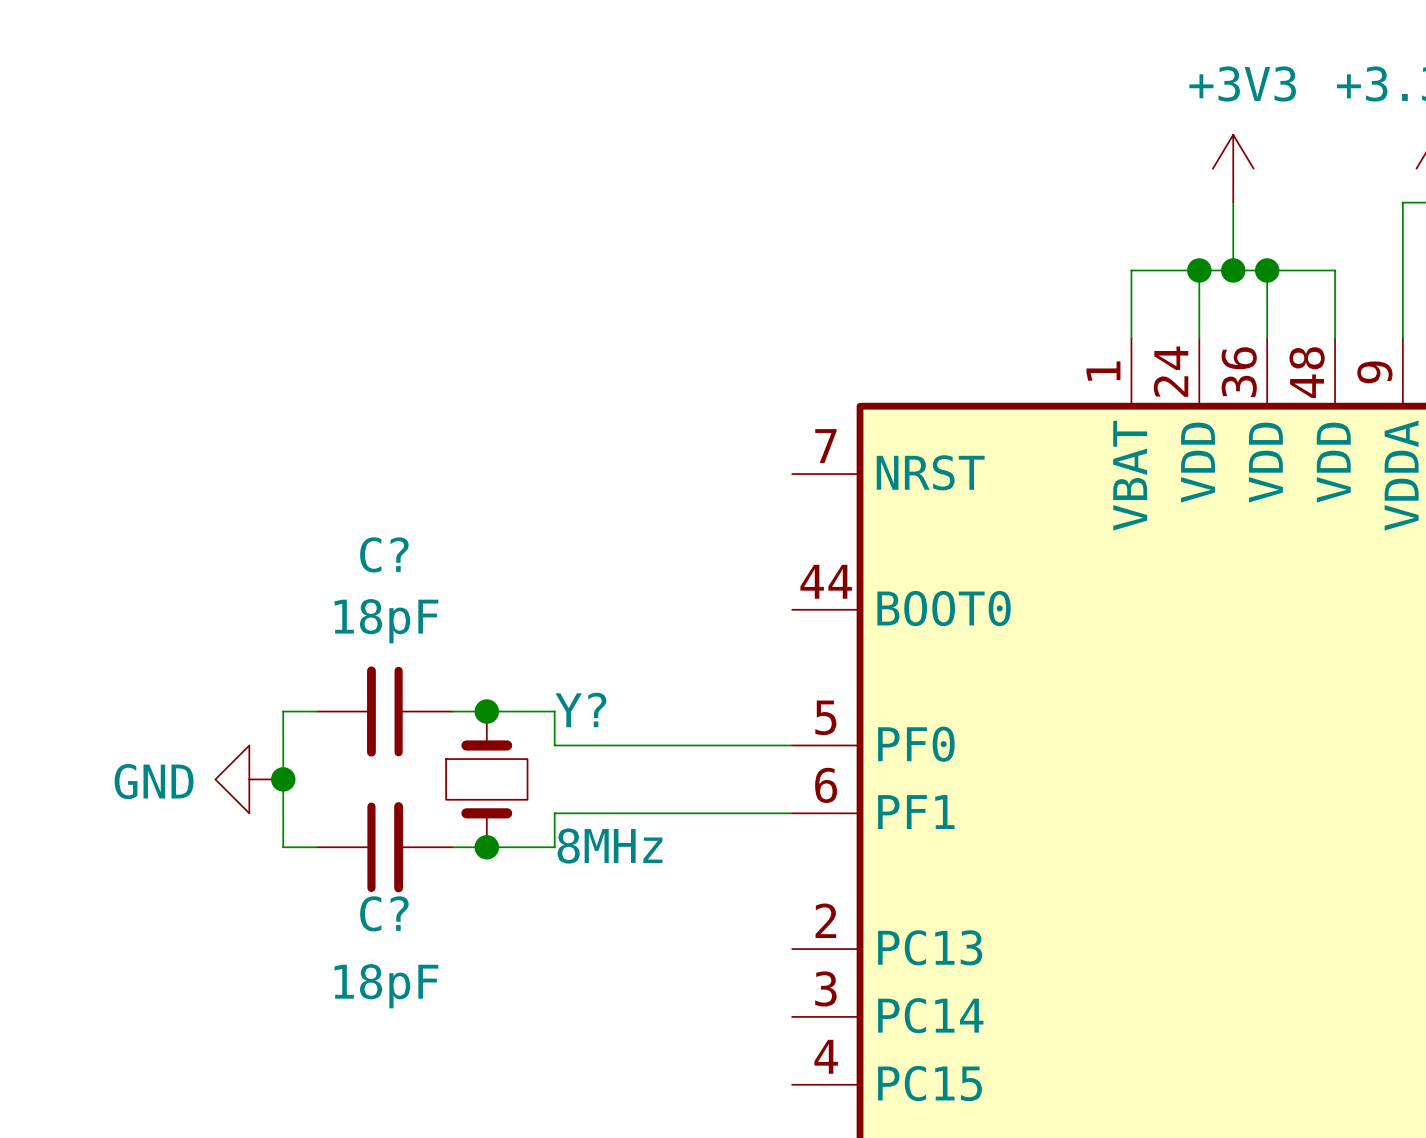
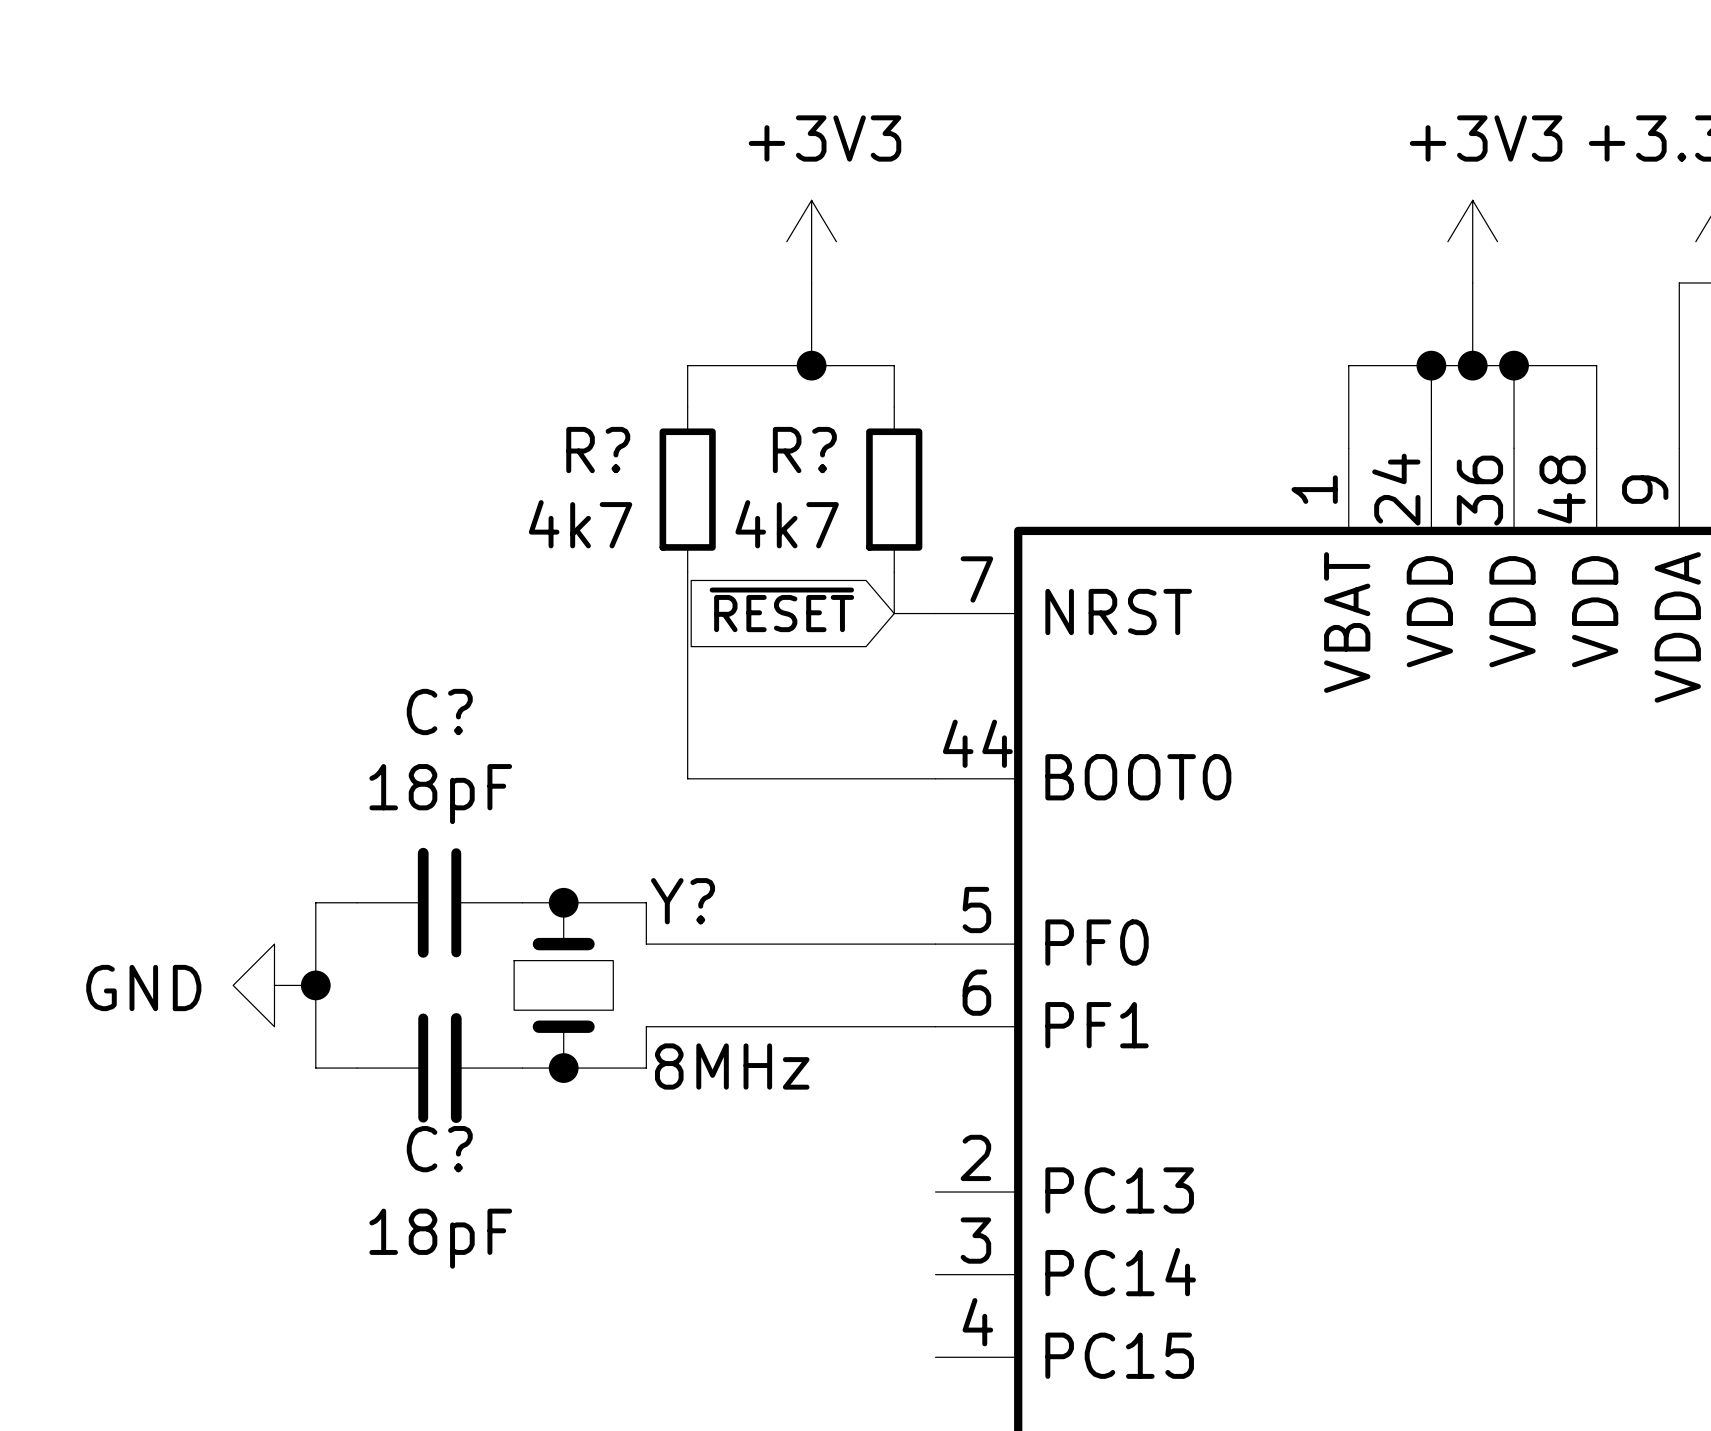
power symbol: none -> +3V3 (811, 241)
wire: none -> (811, 283) (811, 365)
junction: none -> (811, 365)
wire: none -> (687, 406) (687, 365) (894, 365) (894, 406)
R?: none -> 4k7 (687, 489)
R?: none -> 4k7 (894, 489)
wire: none -> (687, 572) (687, 778) (935, 778)
wire: none -> (894, 572) (894, 613) (935, 613)
global label: none -> ~{RESET} (781, 609)

